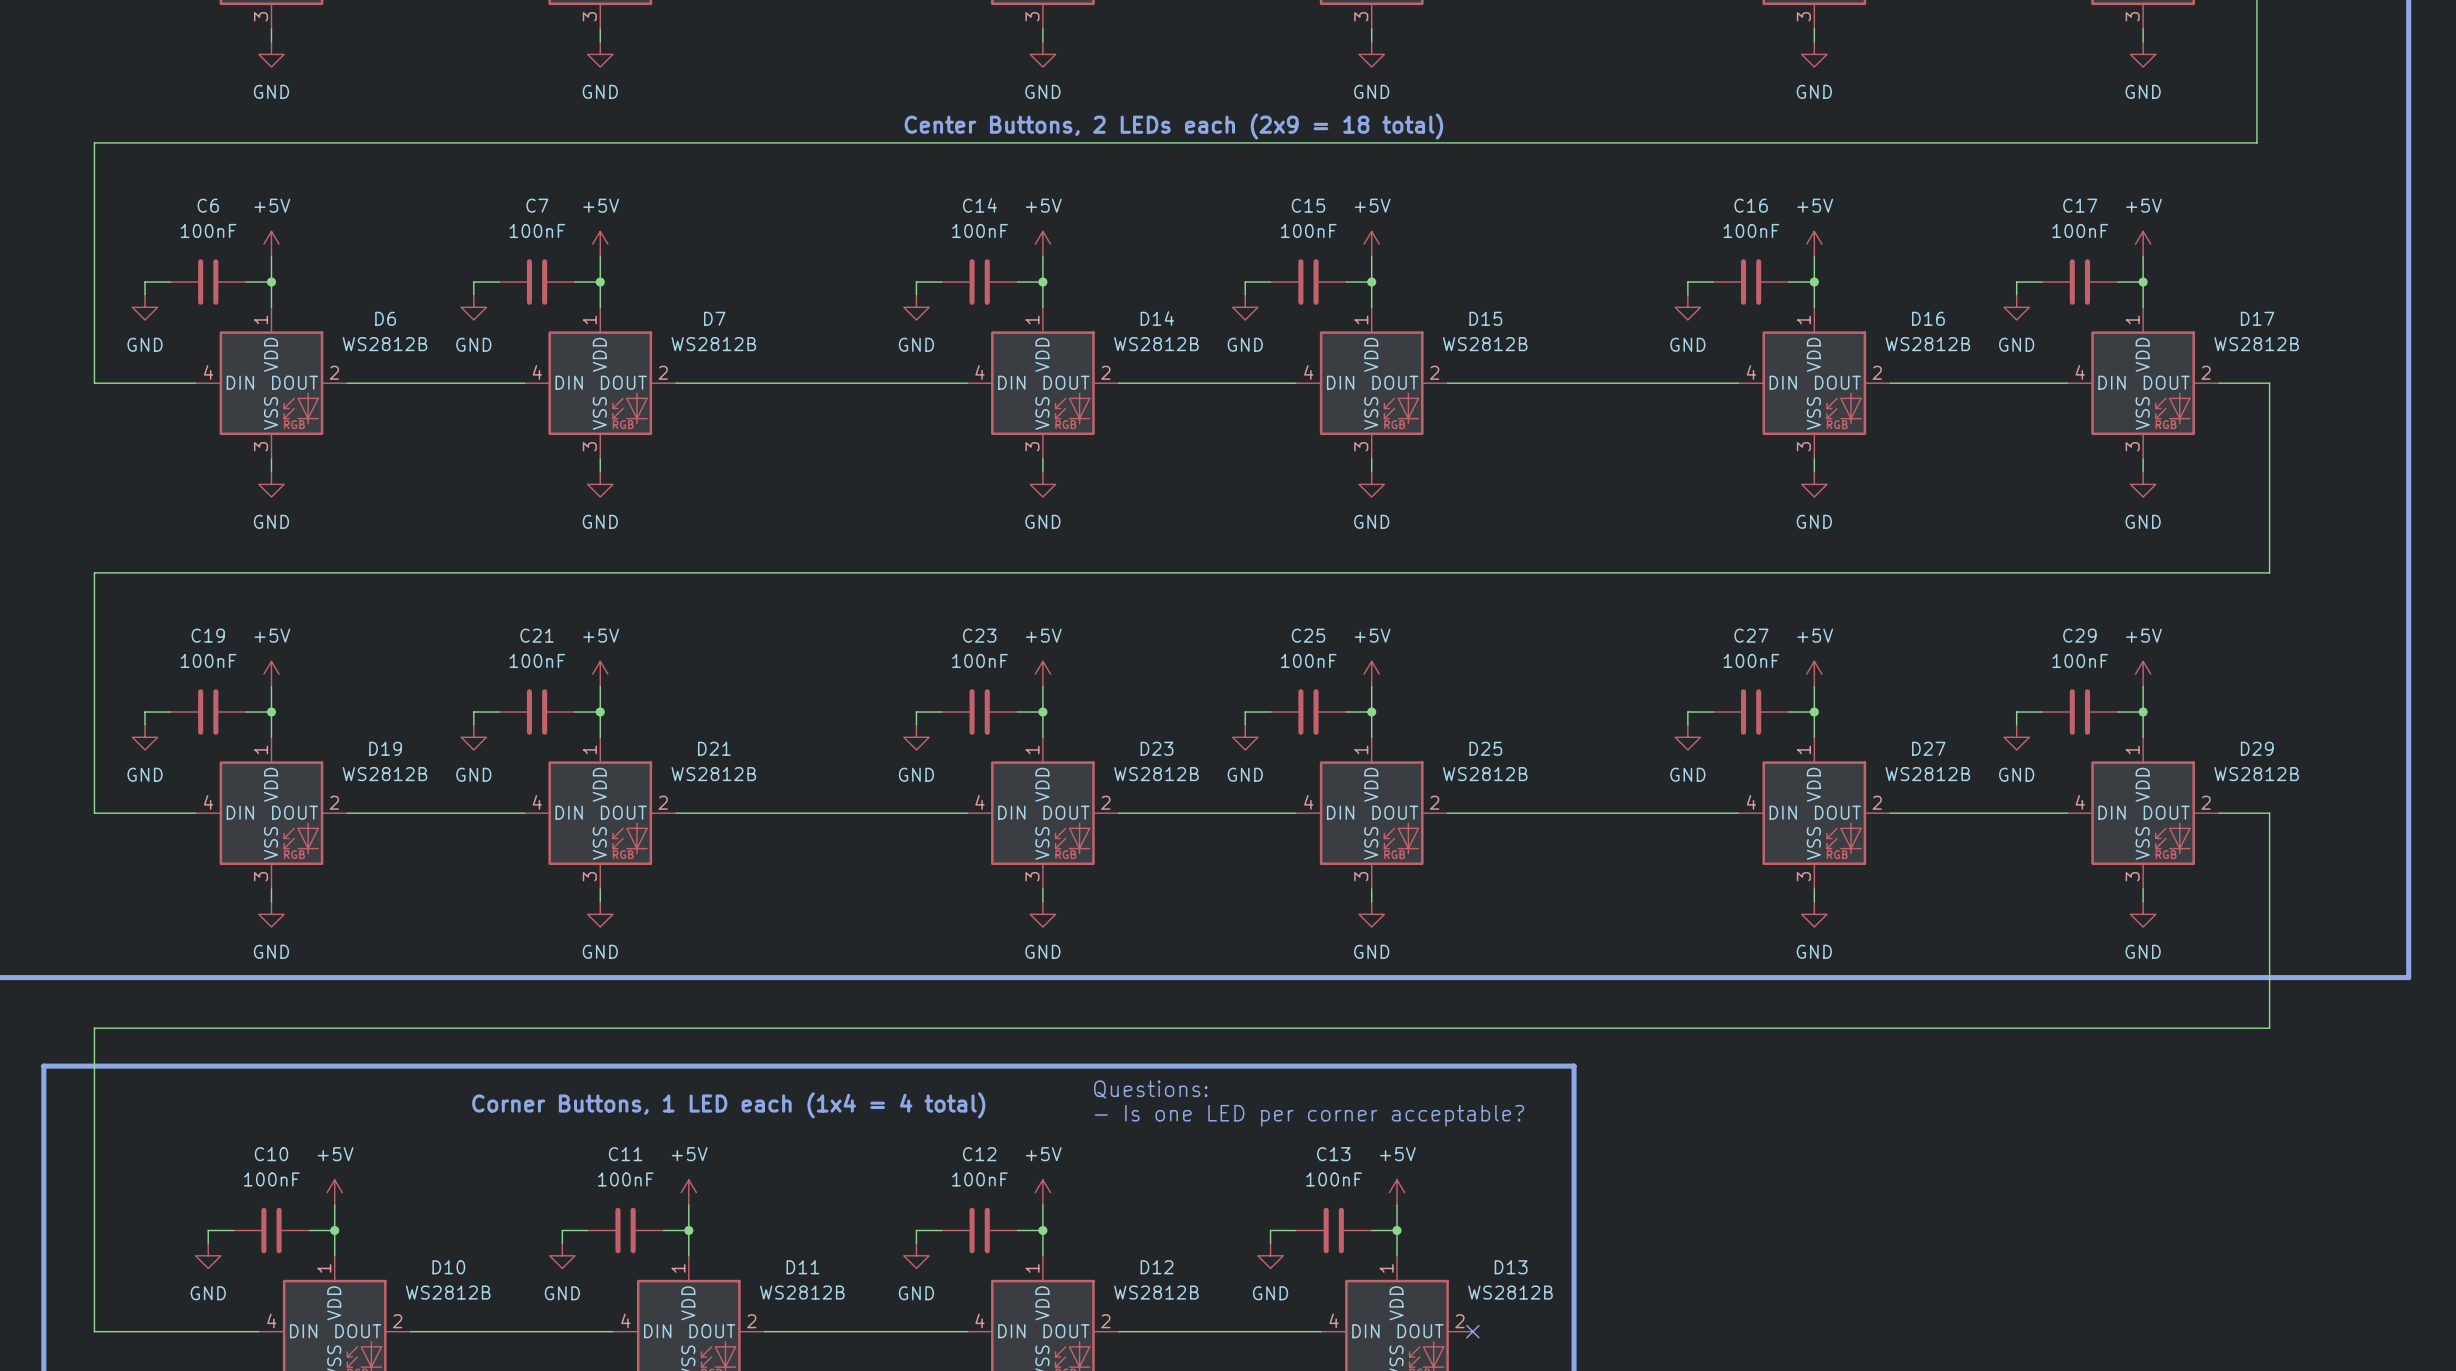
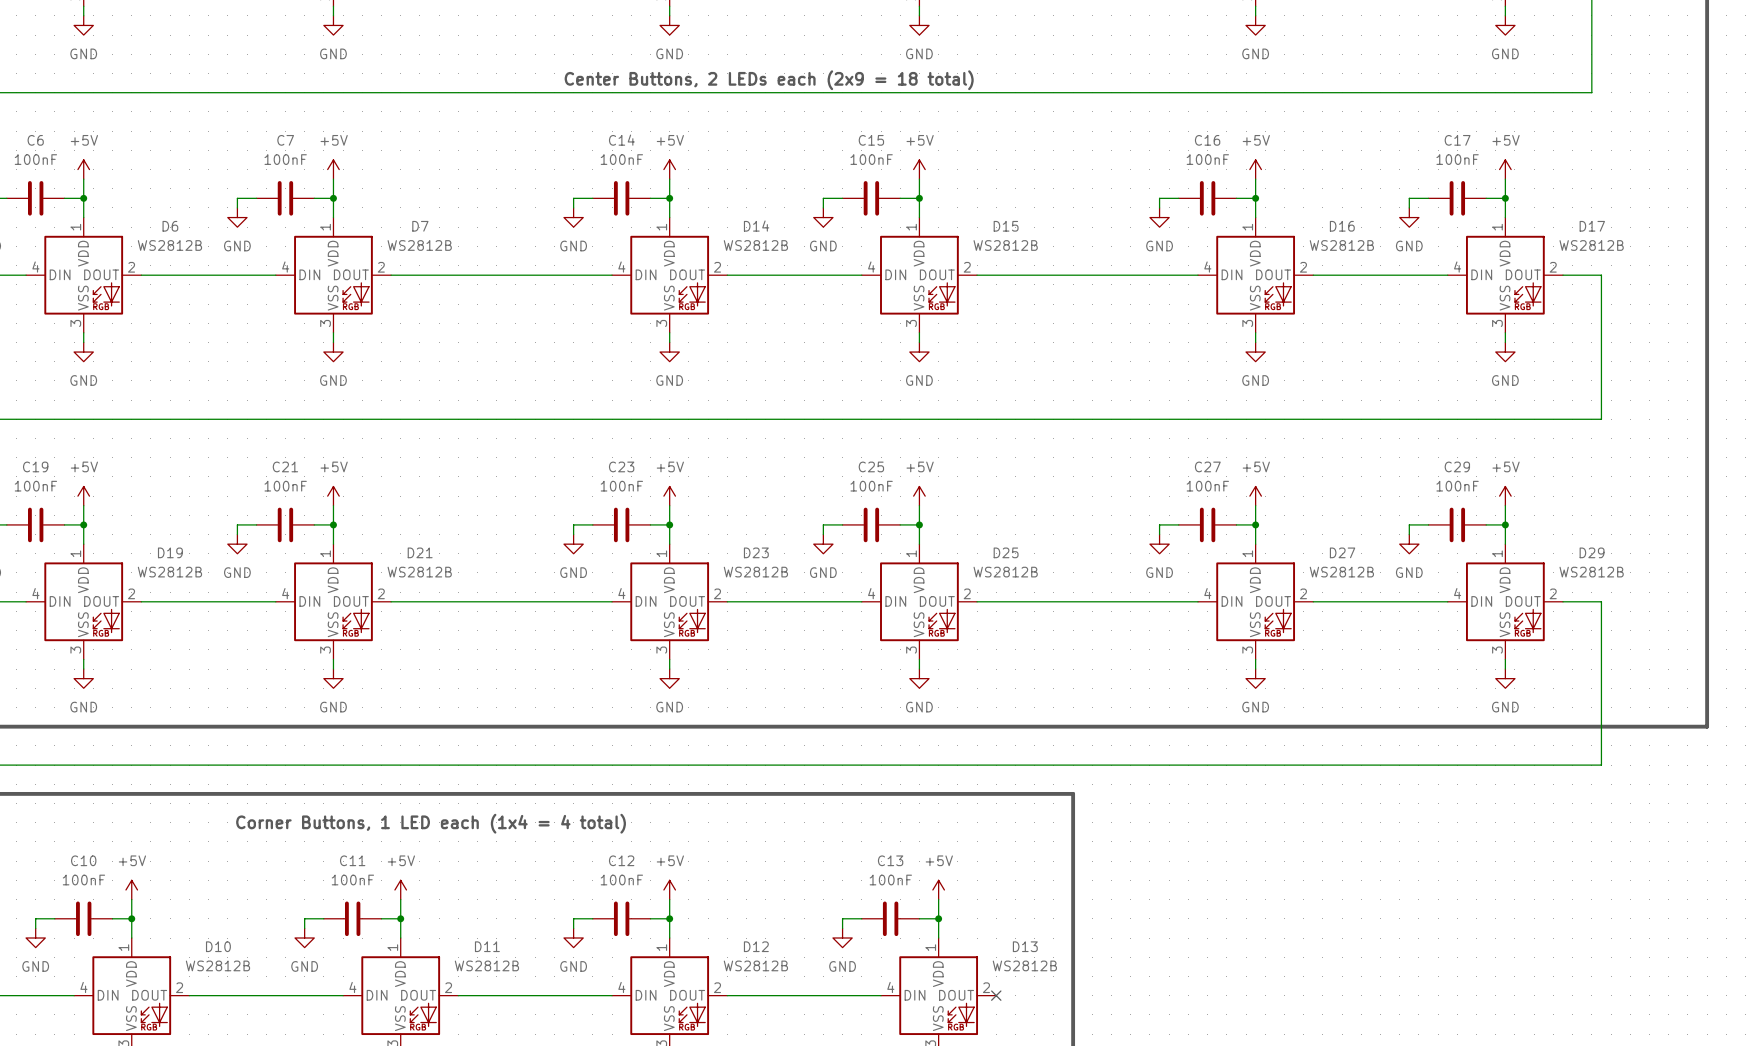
text: Questions: (1150, 1089) -> none
text: - Is one LED per corner acceptable? (1309, 1115) -> none

